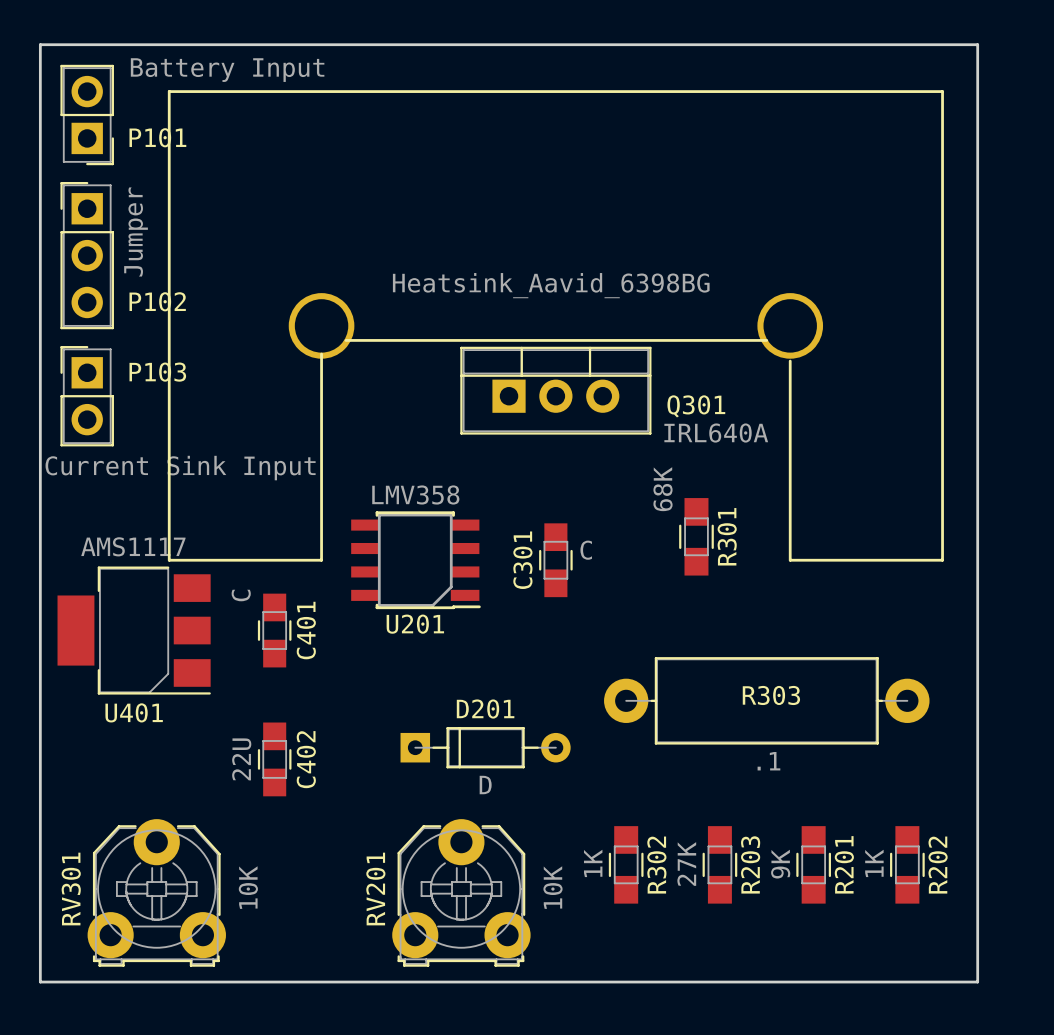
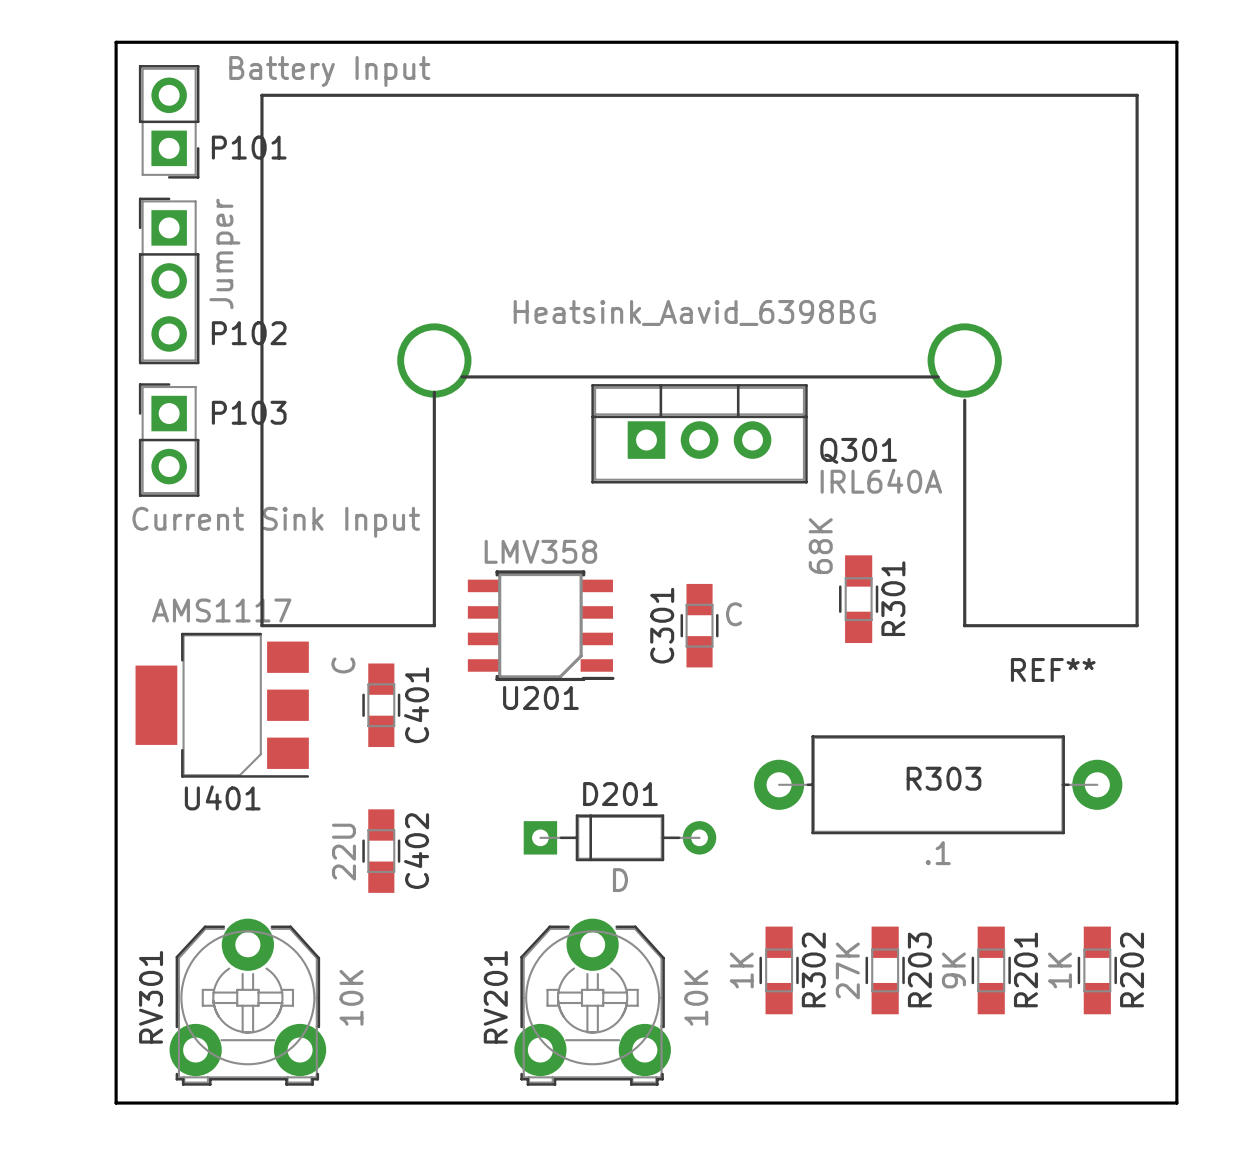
REF** name: none -> REF** (1053, 669)

